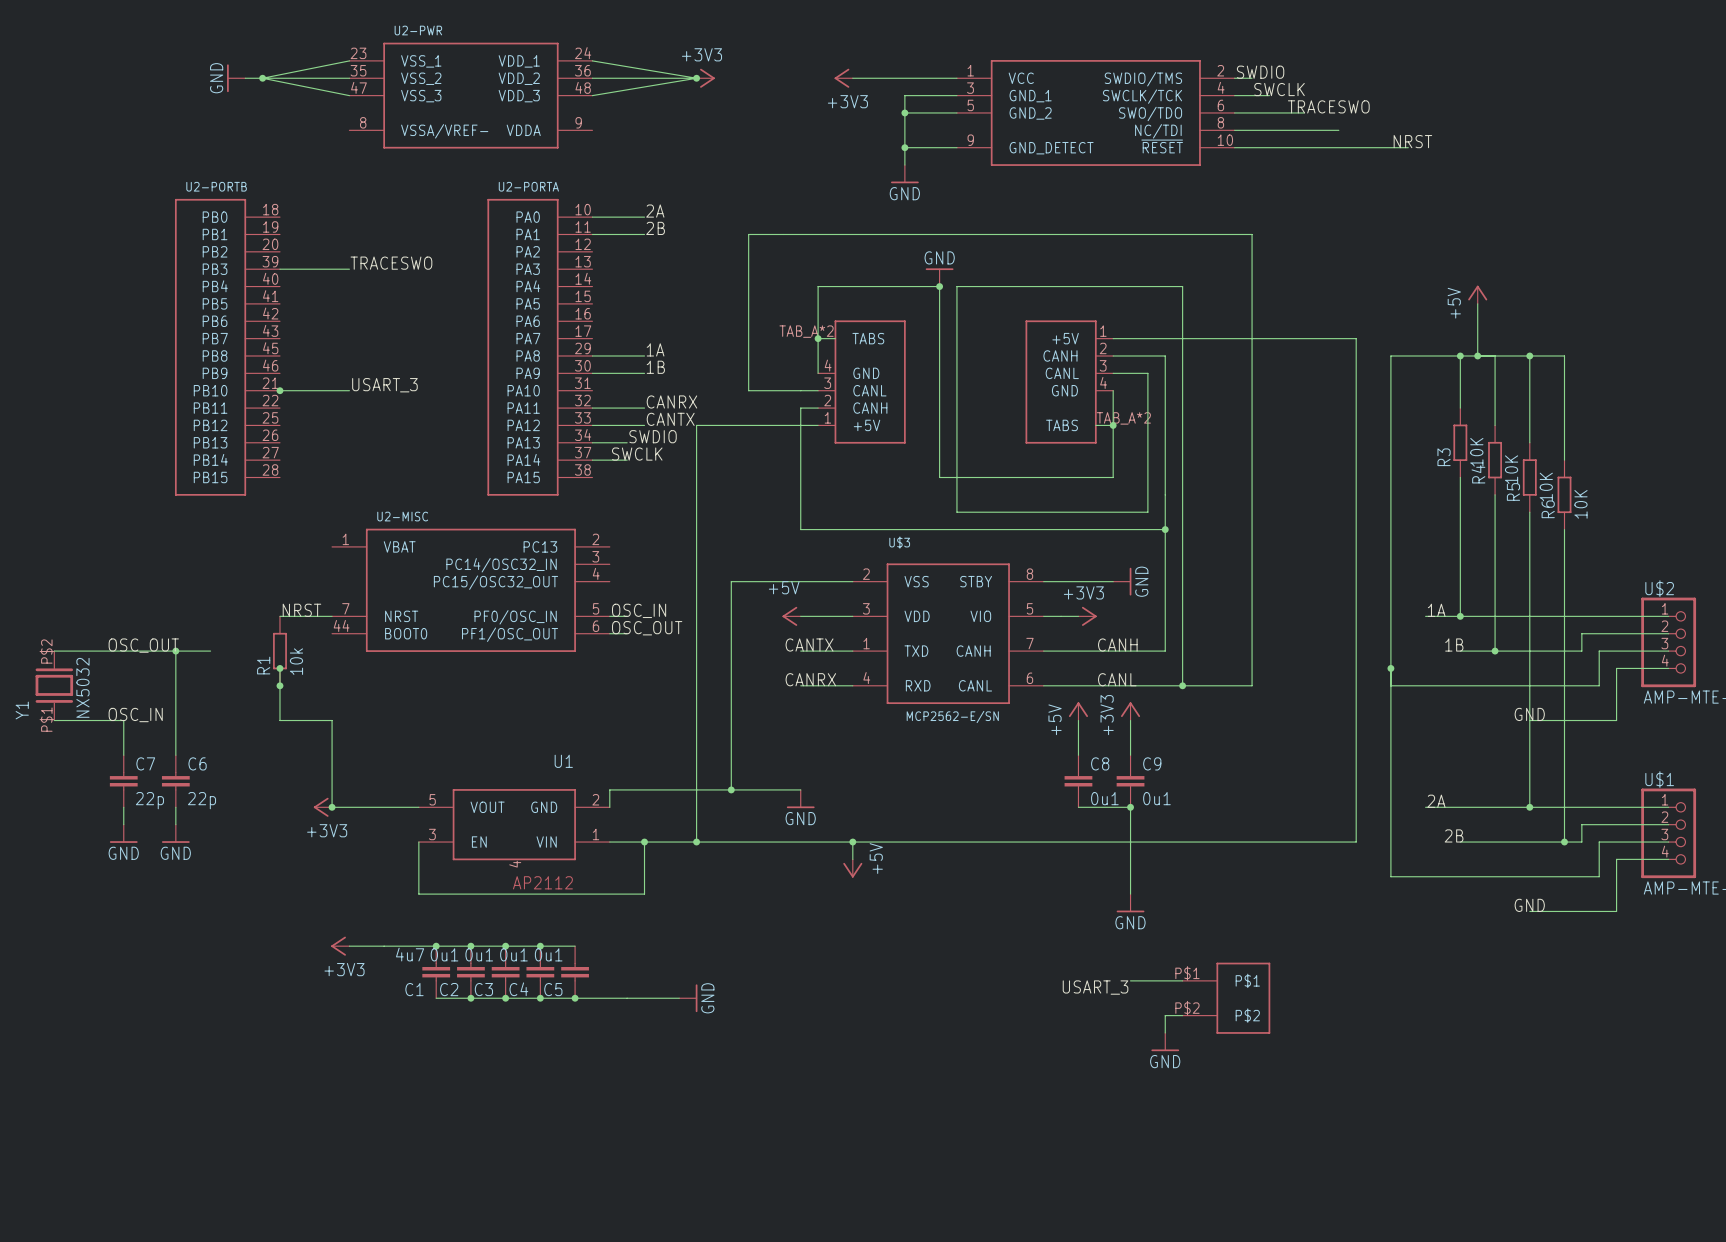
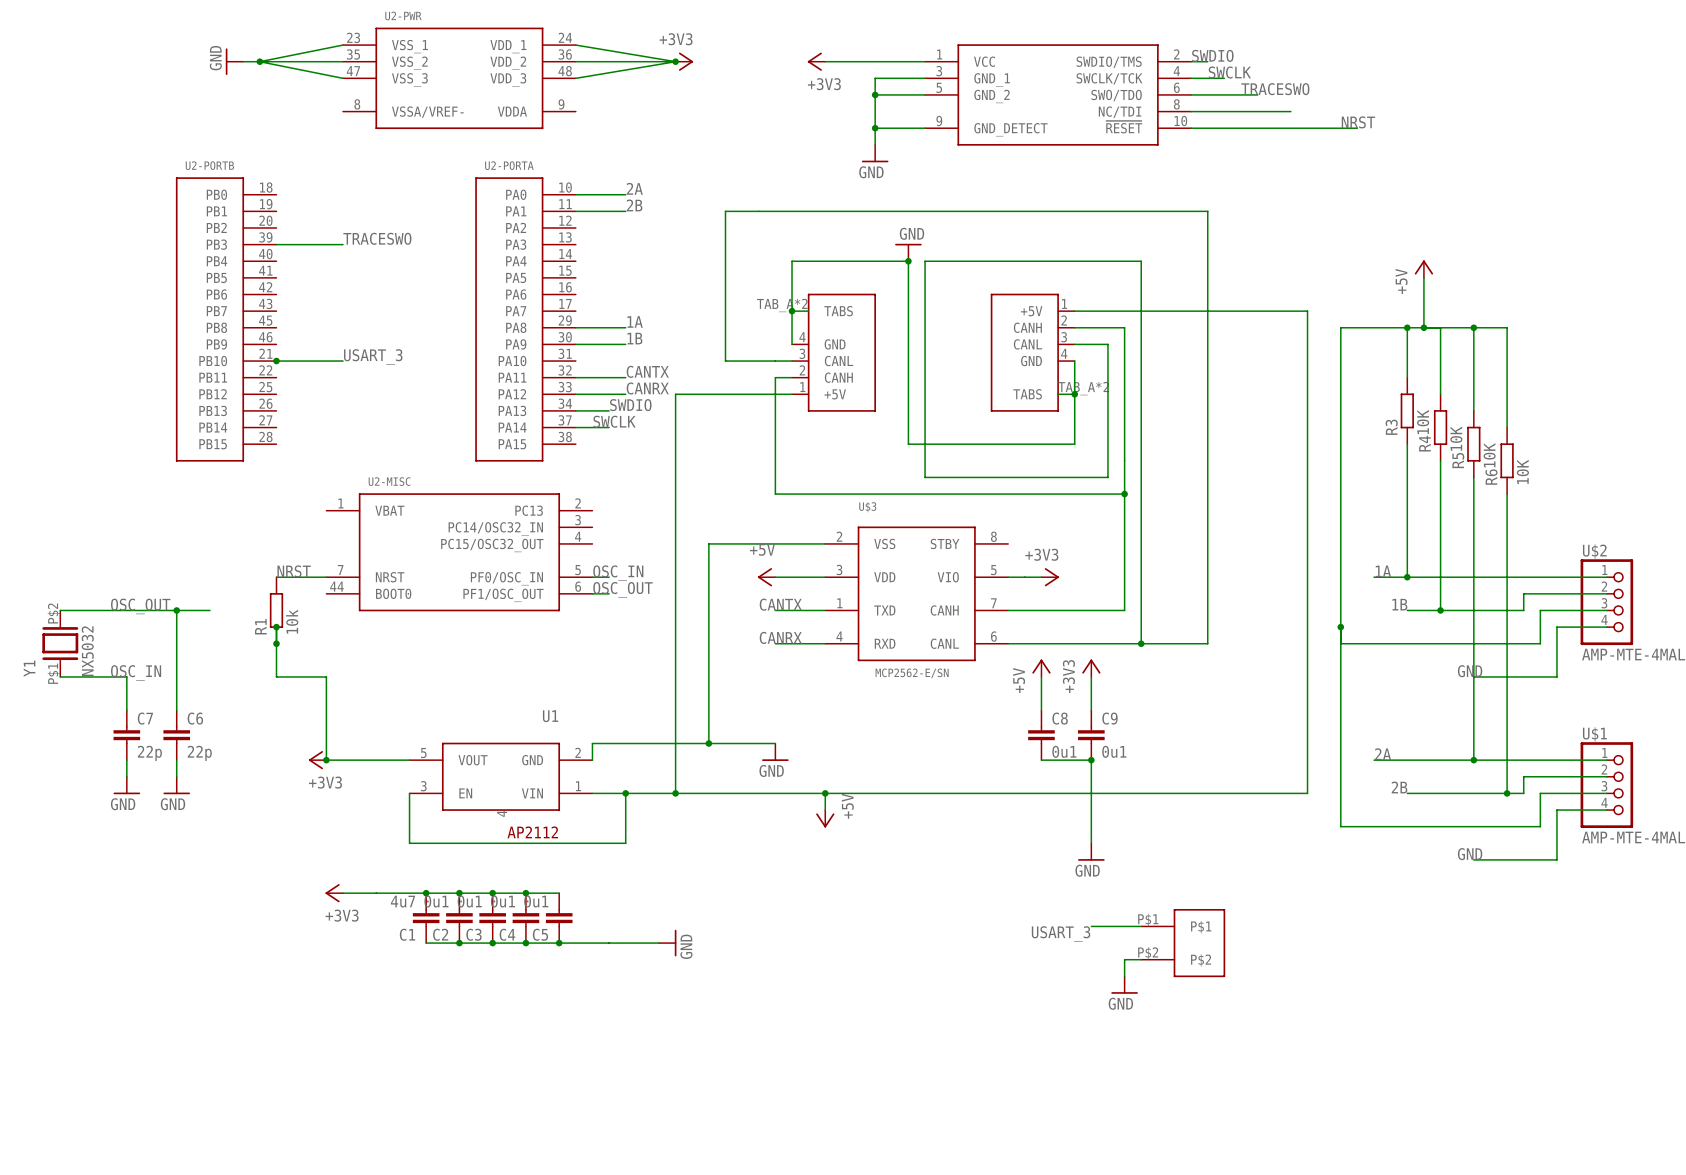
label: CANRX (671, 401) -> CANTX (647, 371)
label: CANTX (670, 419) -> CANRX (647, 388)
wire: (1043, 581) (1113, 581) -> none
power symbol: GND (1122, 581) -> none
label: CANH (1117, 645) -> none
label: CANL (1117, 679) -> none

